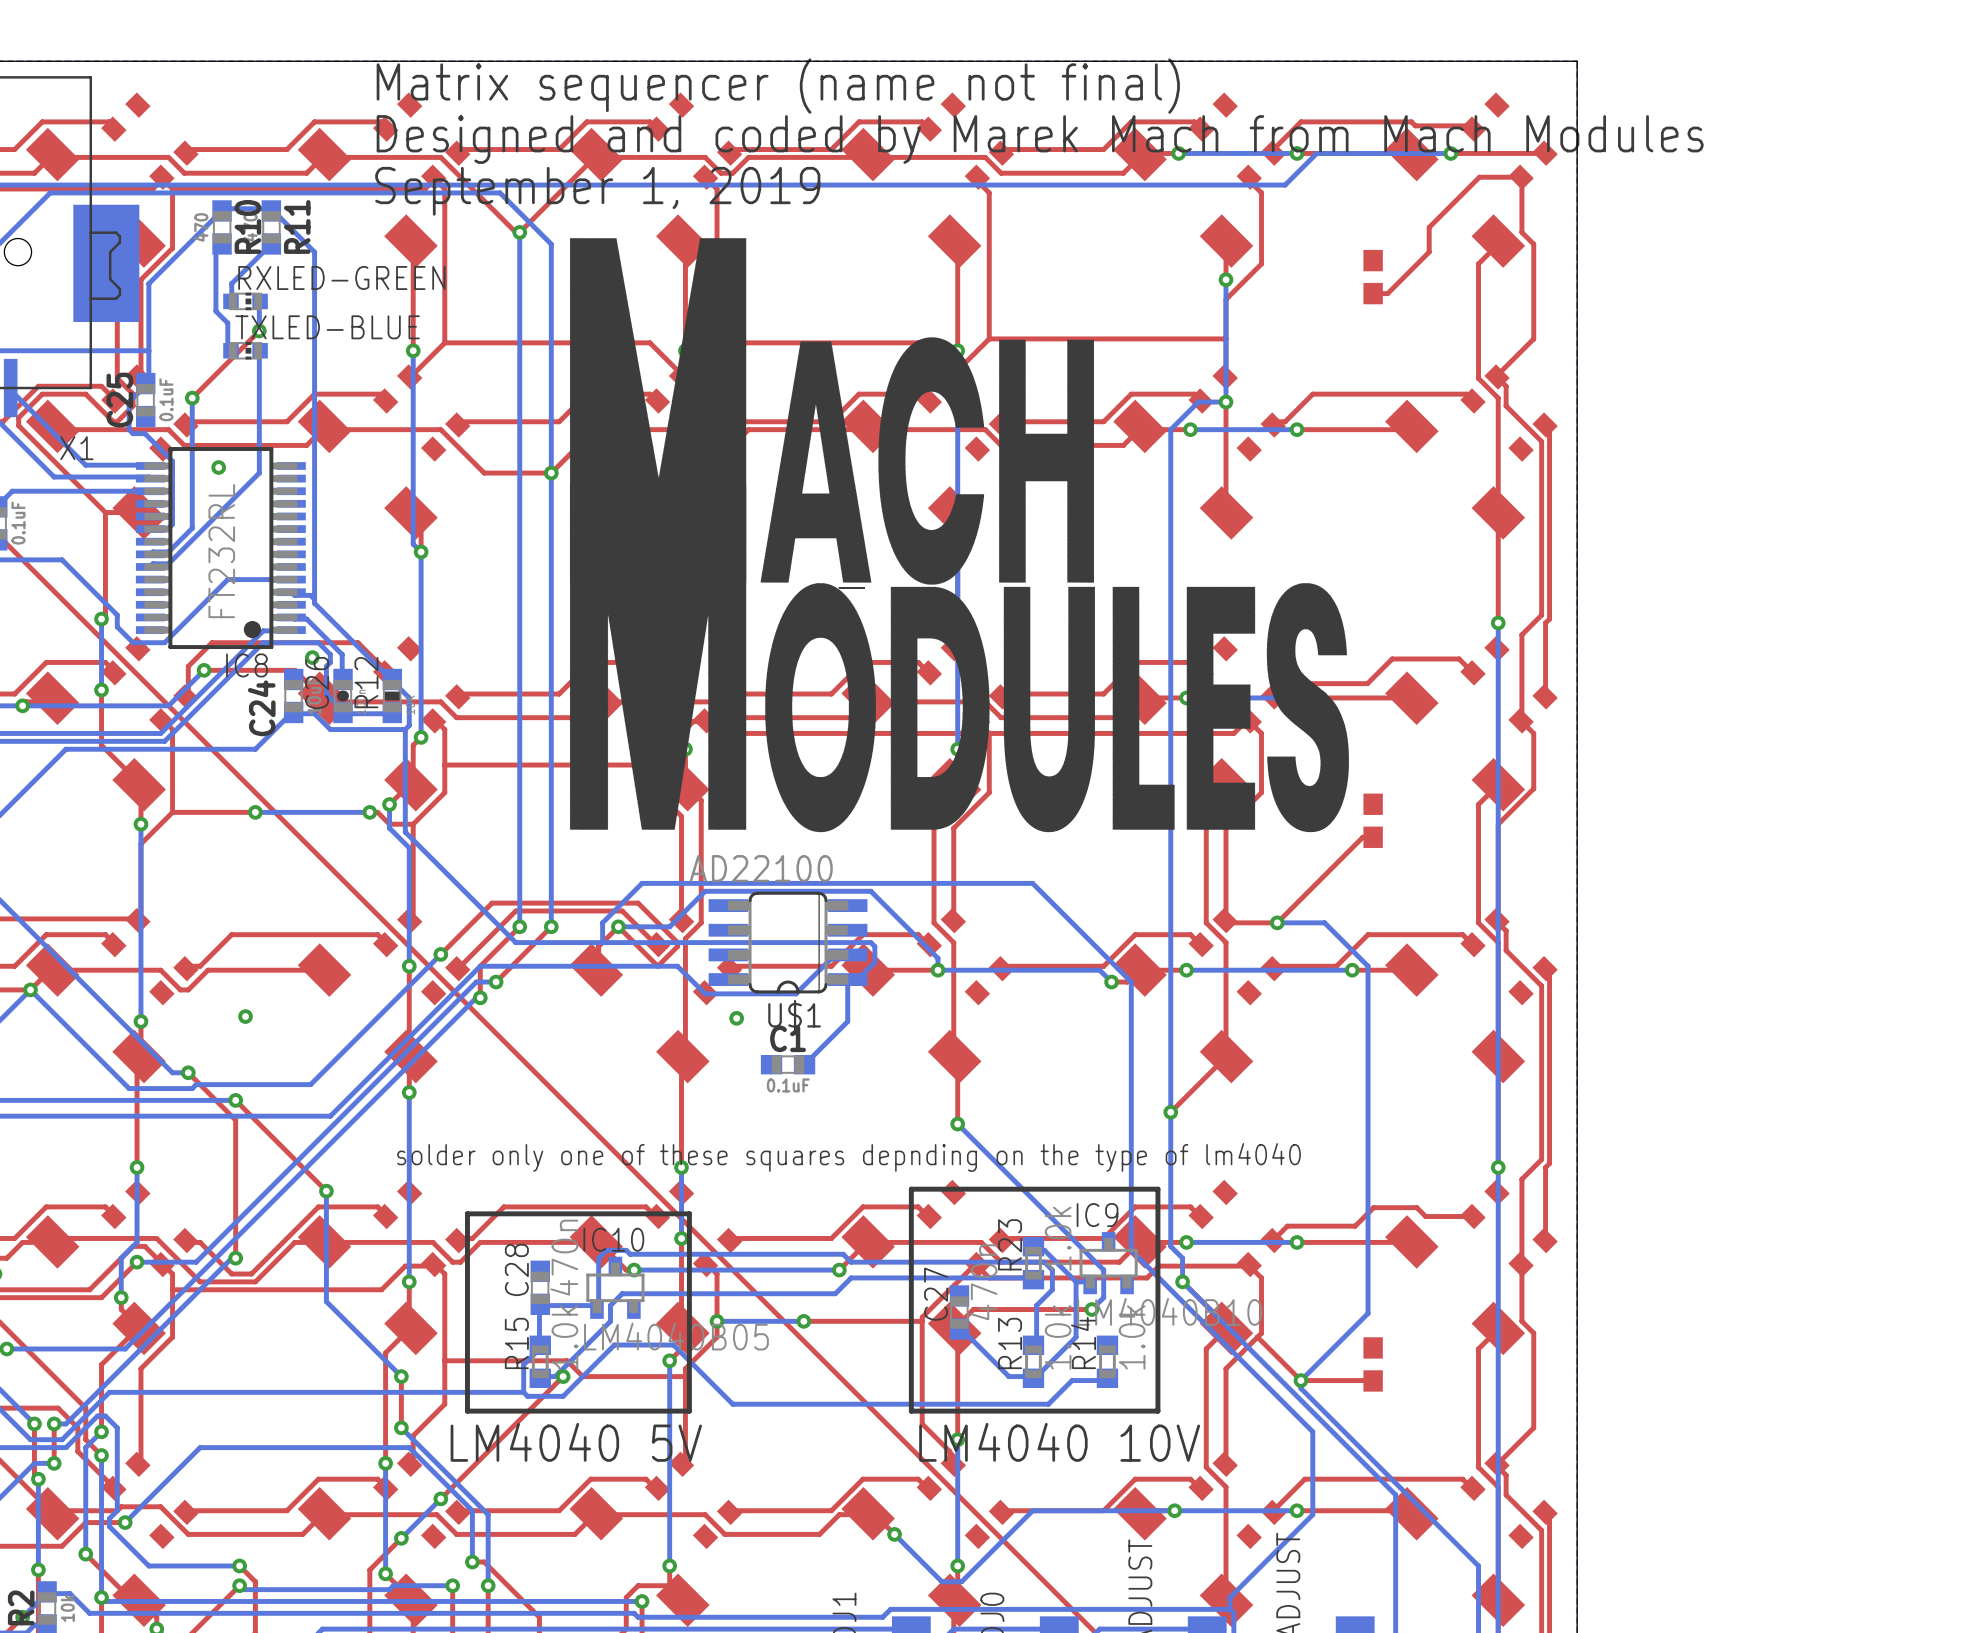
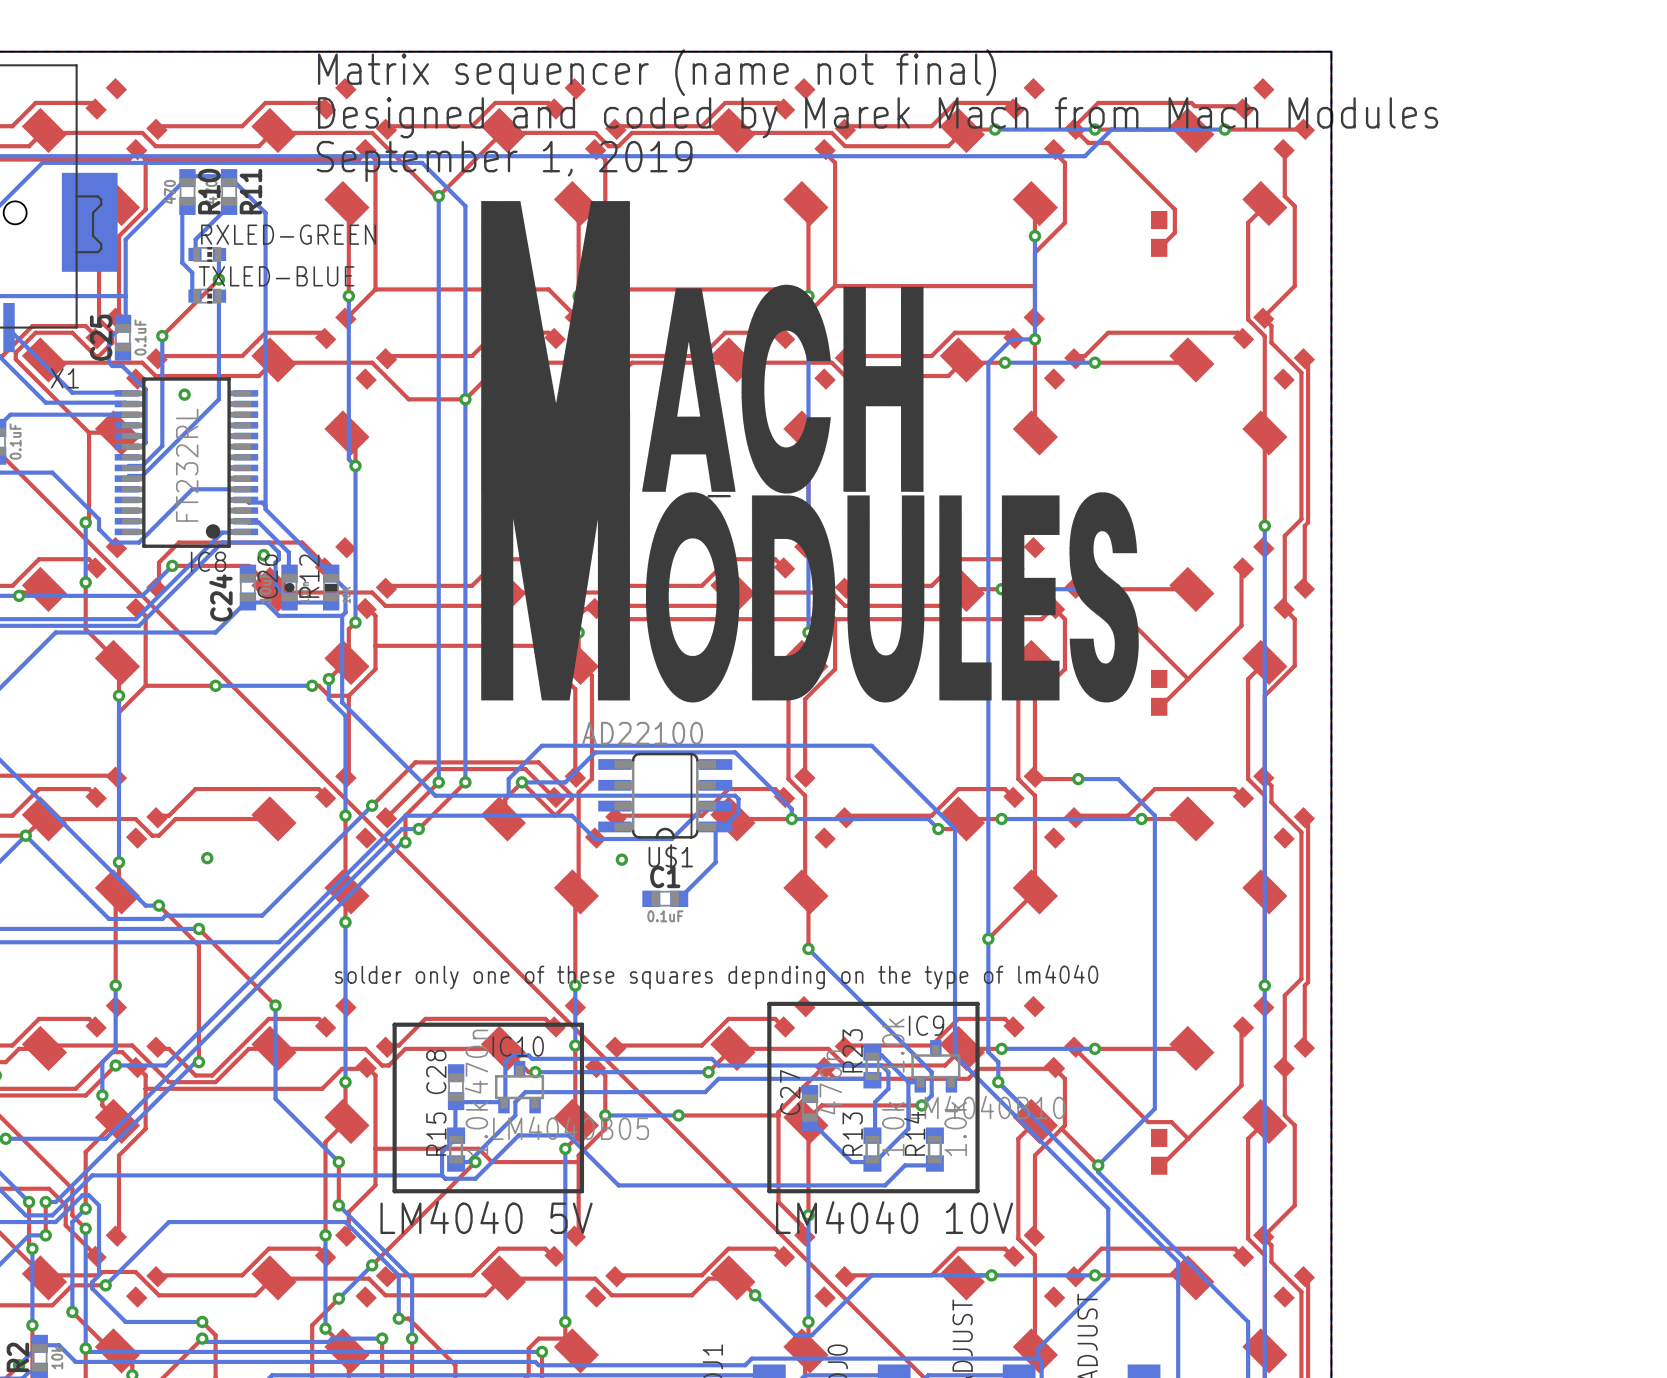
top track: (1521, 177) (1479, 177) (1429, 227) (1429, 252) (1387, 293) (1373, 293) -> (1074, 129) (1088, 142) (1108, 142) (1174, 209) (1174, 232) (1159, 247)
top track: (1473, 672) (1459, 658) (1392, 658) (1367, 683) (1287, 683) (1273, 697) -> (1188, 679) (1098, 589) (1074, 589)
top track: (1373, 837) (1362, 837) (1277, 922) -> (1159, 706) (1241, 625) (1241, 569) (1243, 568)
top track: (1473, 1216) (1425, 1216) (1416, 1207) (1373, 1207) (1355, 1226) (1287, 1226) (1273, 1240) -> none
top track: none -> (1074, 1048) (1148, 1122) (1171, 1122) (1188, 1138)
top track: (1300, 1380) (1373, 1380) -> (1241, 1028) (1241, 1085) (1159, 1165)

